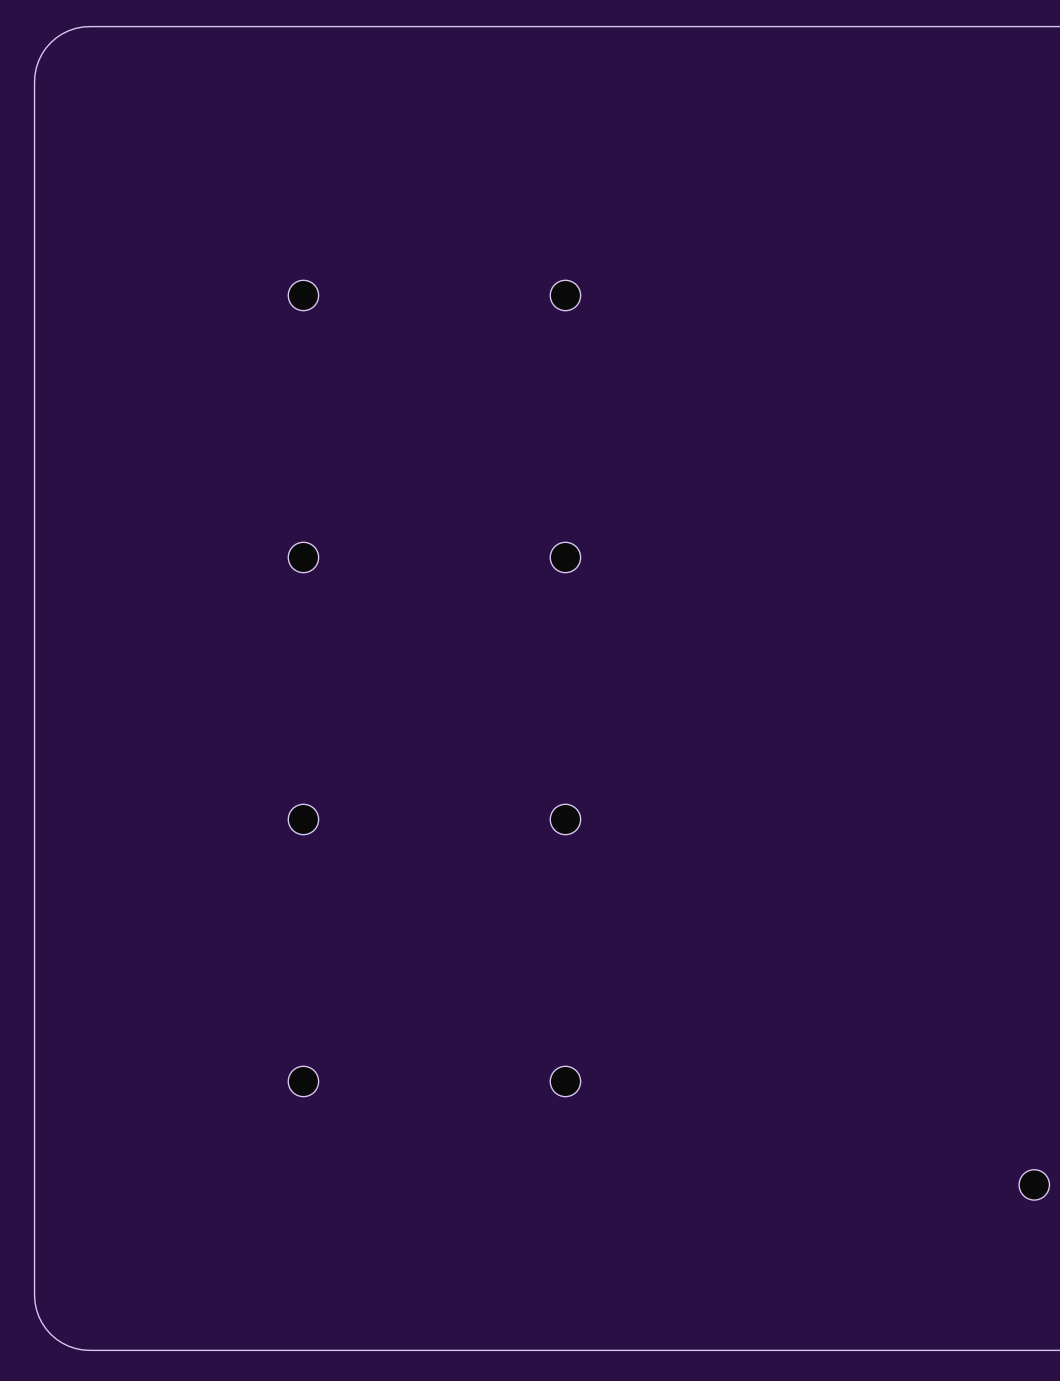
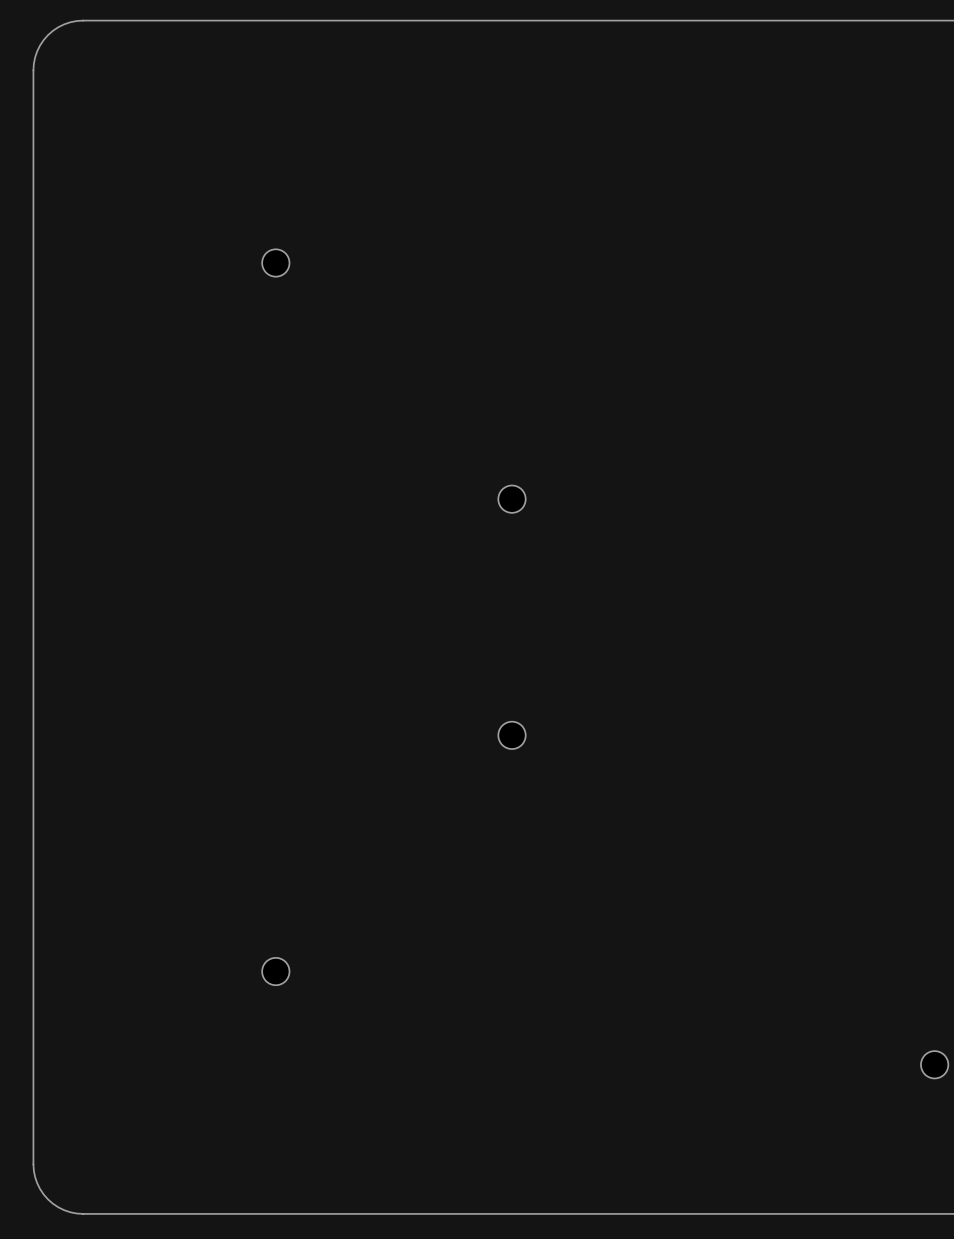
part: (565, 295) -> none
part: (303, 557) -> none
part: (303, 819) -> none
part: (565, 1081) -> none

